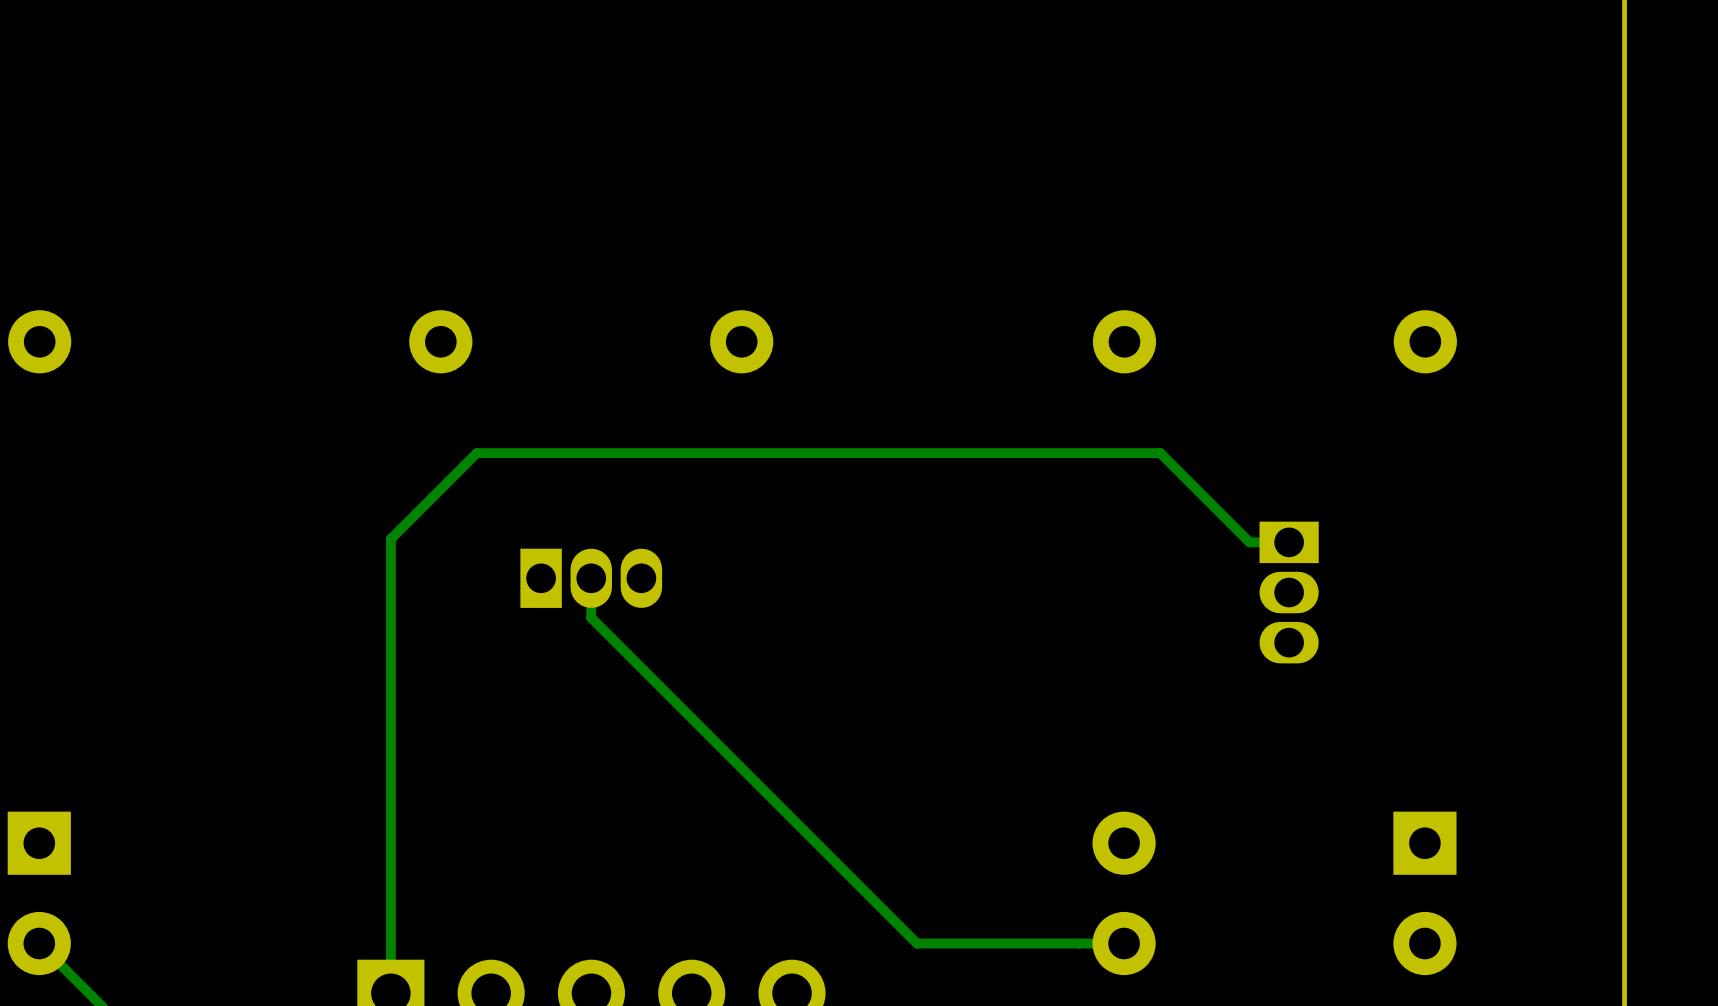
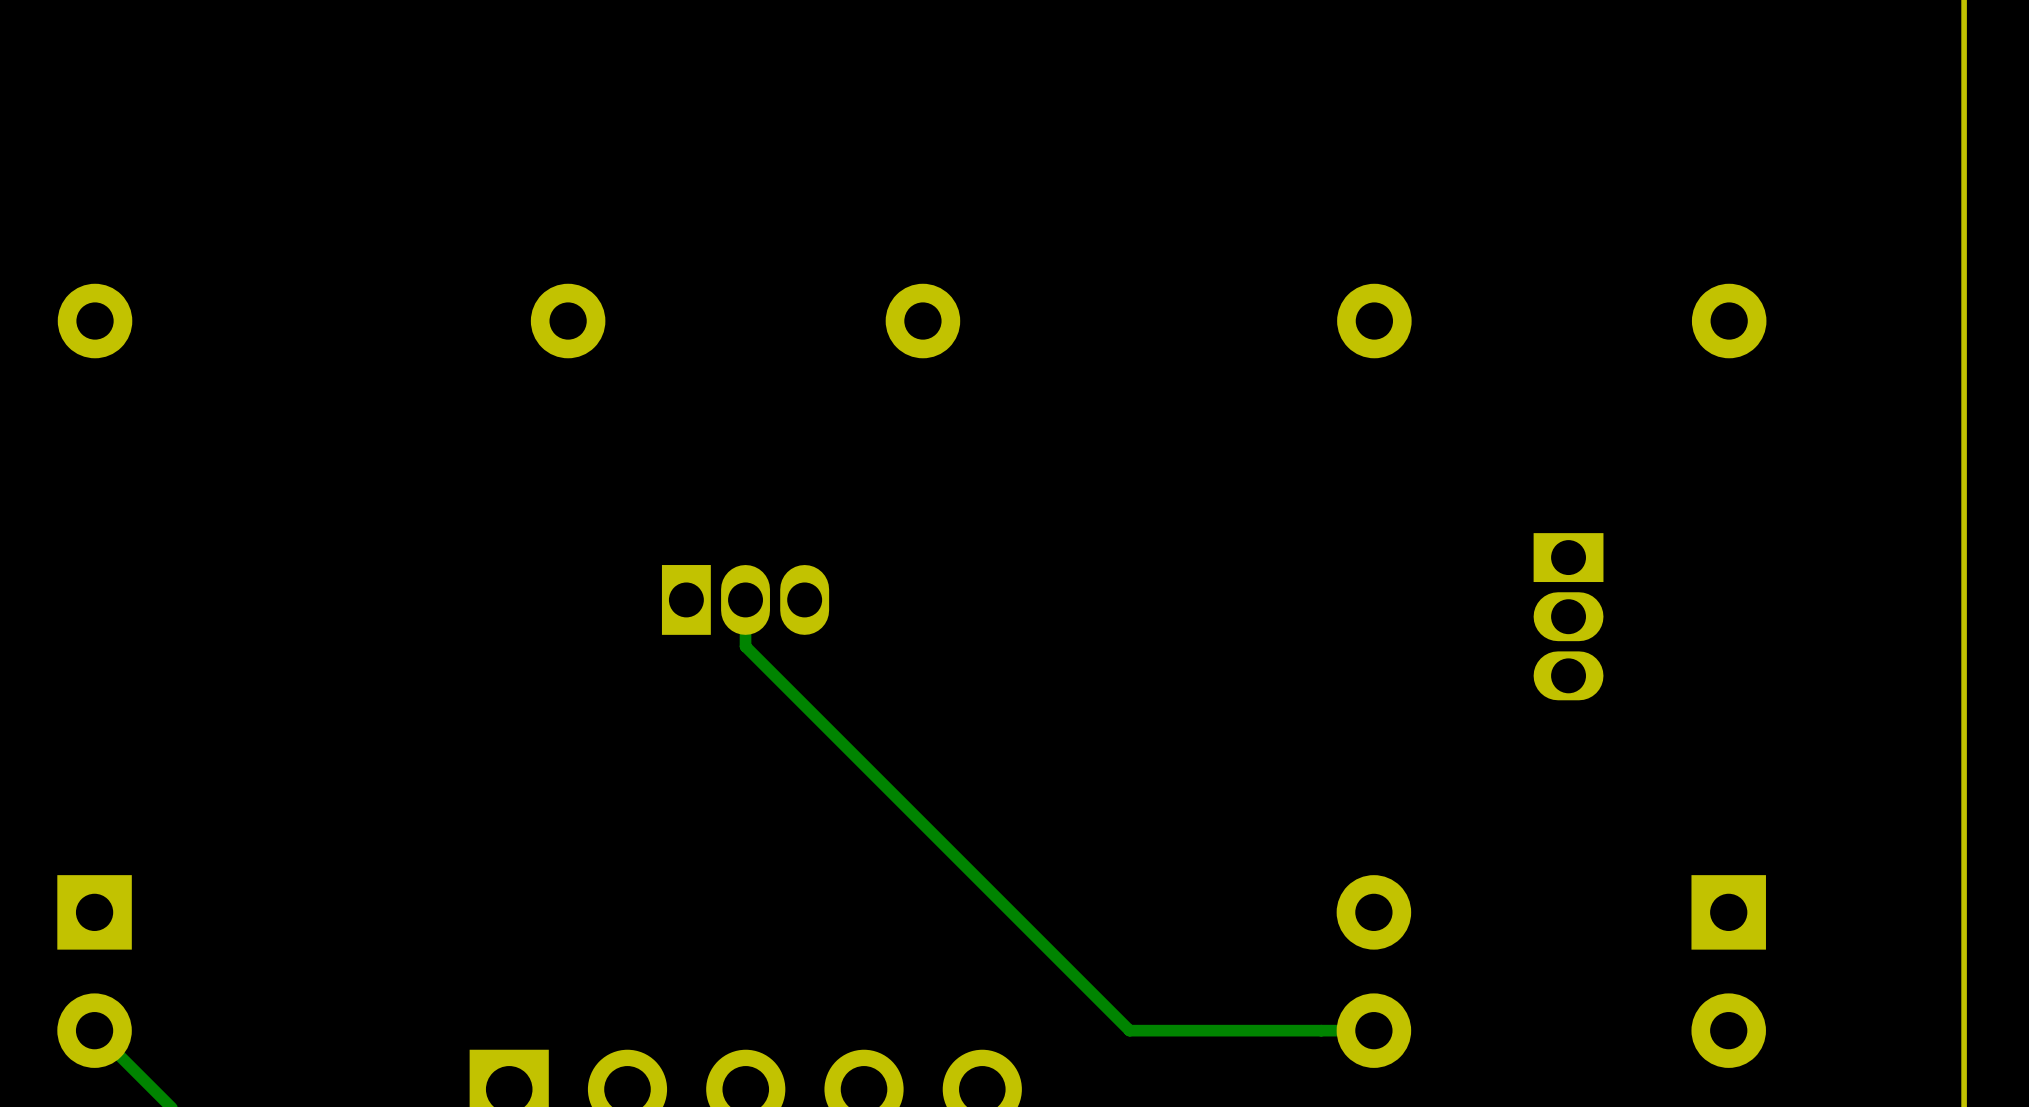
track: (1289, 542) (1249, 542) (1160, 453) (476, 453) (390, 539) (390, 993) -> none

